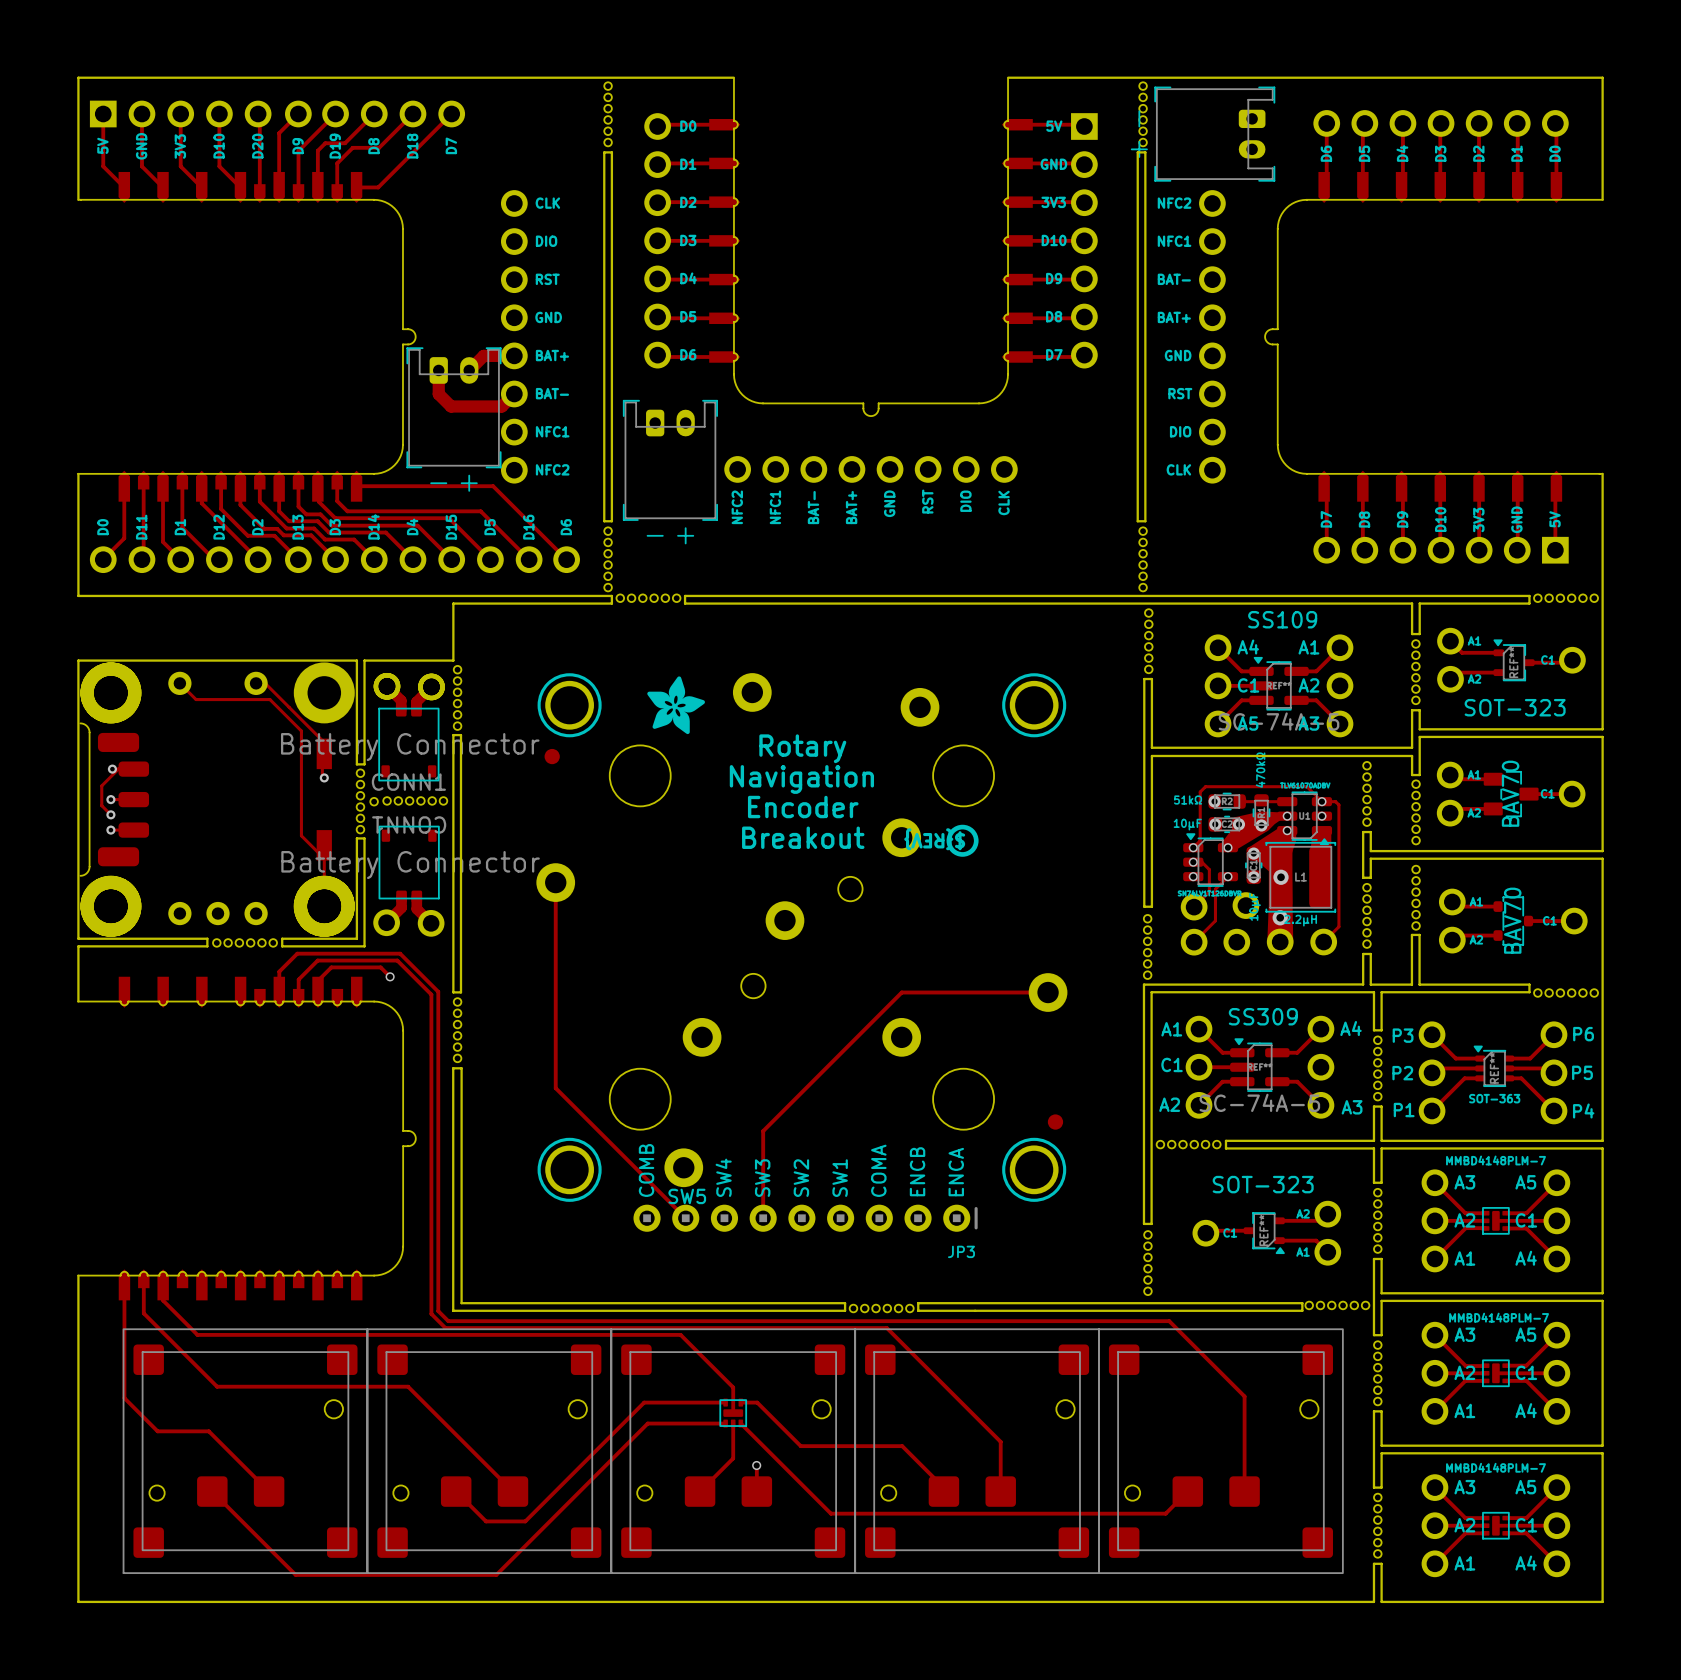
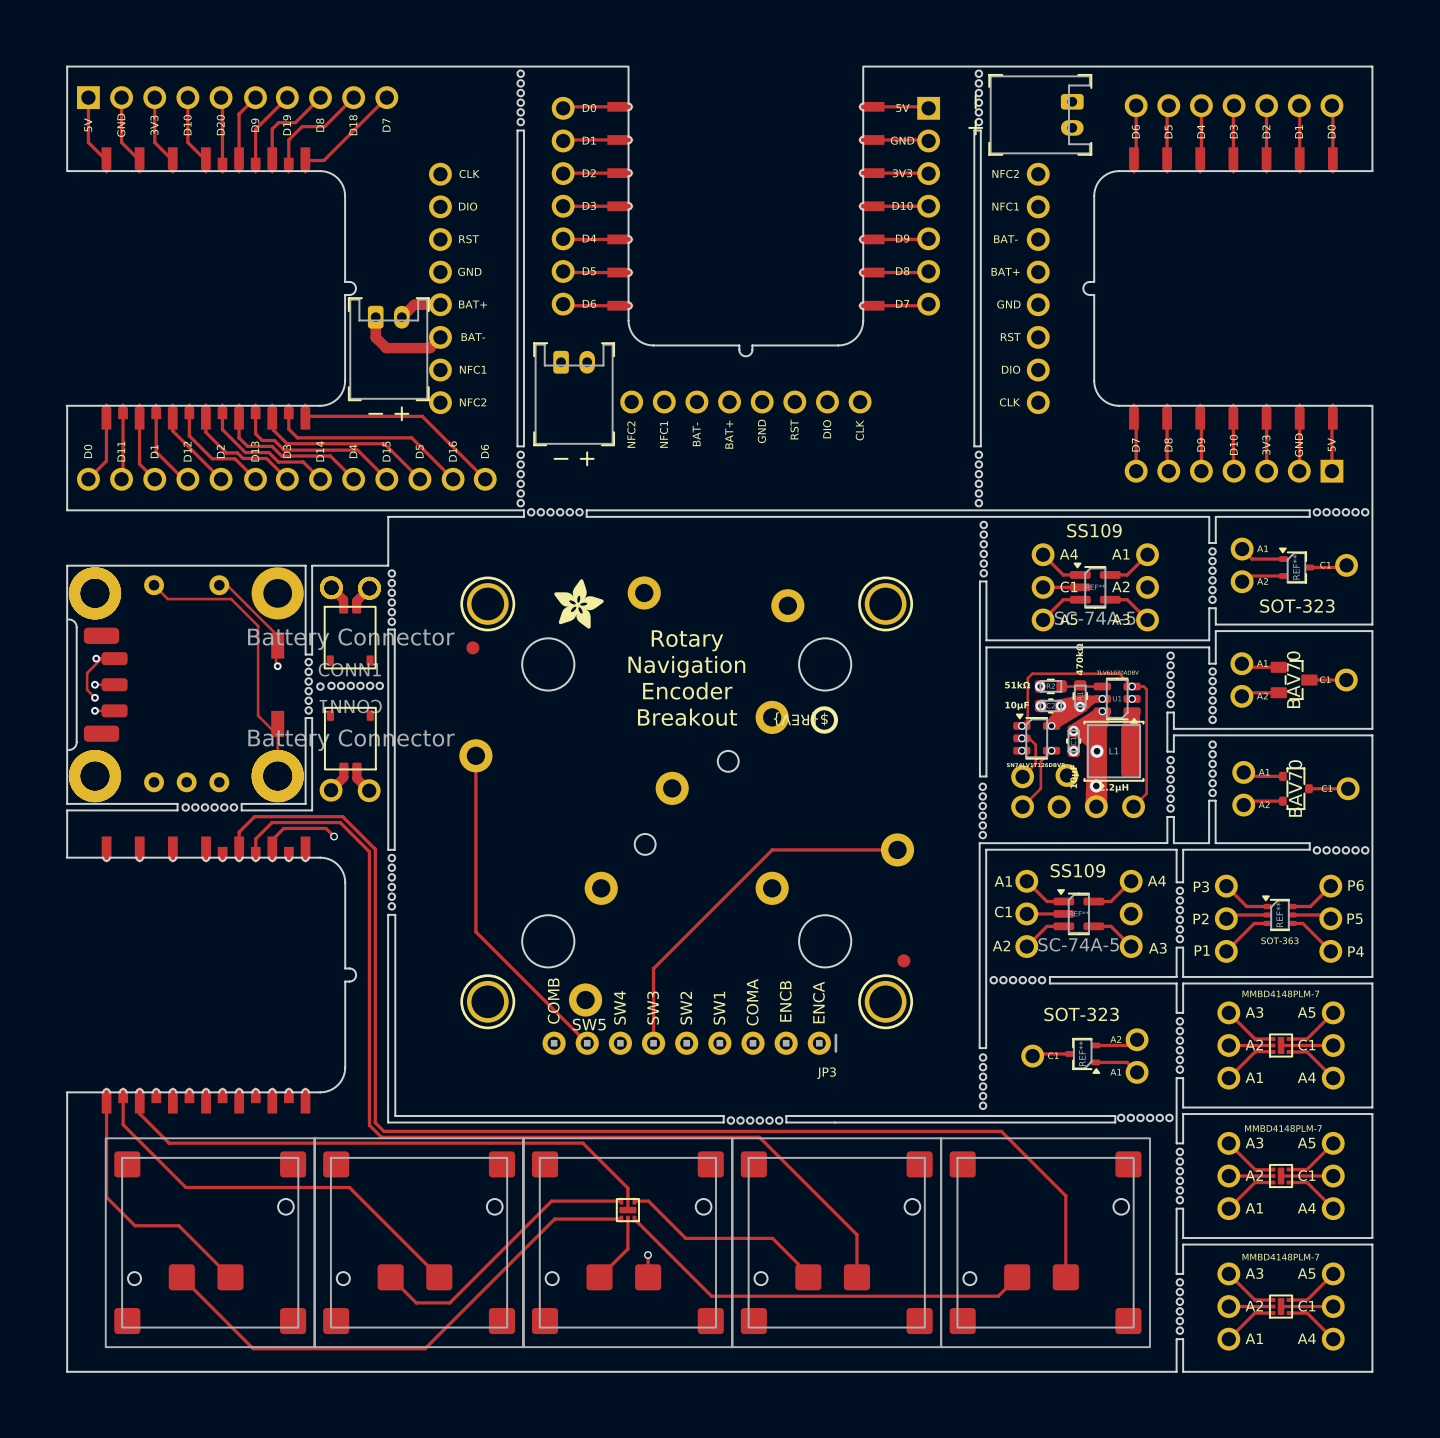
text: SS309 (1263, 1016) -> SS109 (1077, 870)

